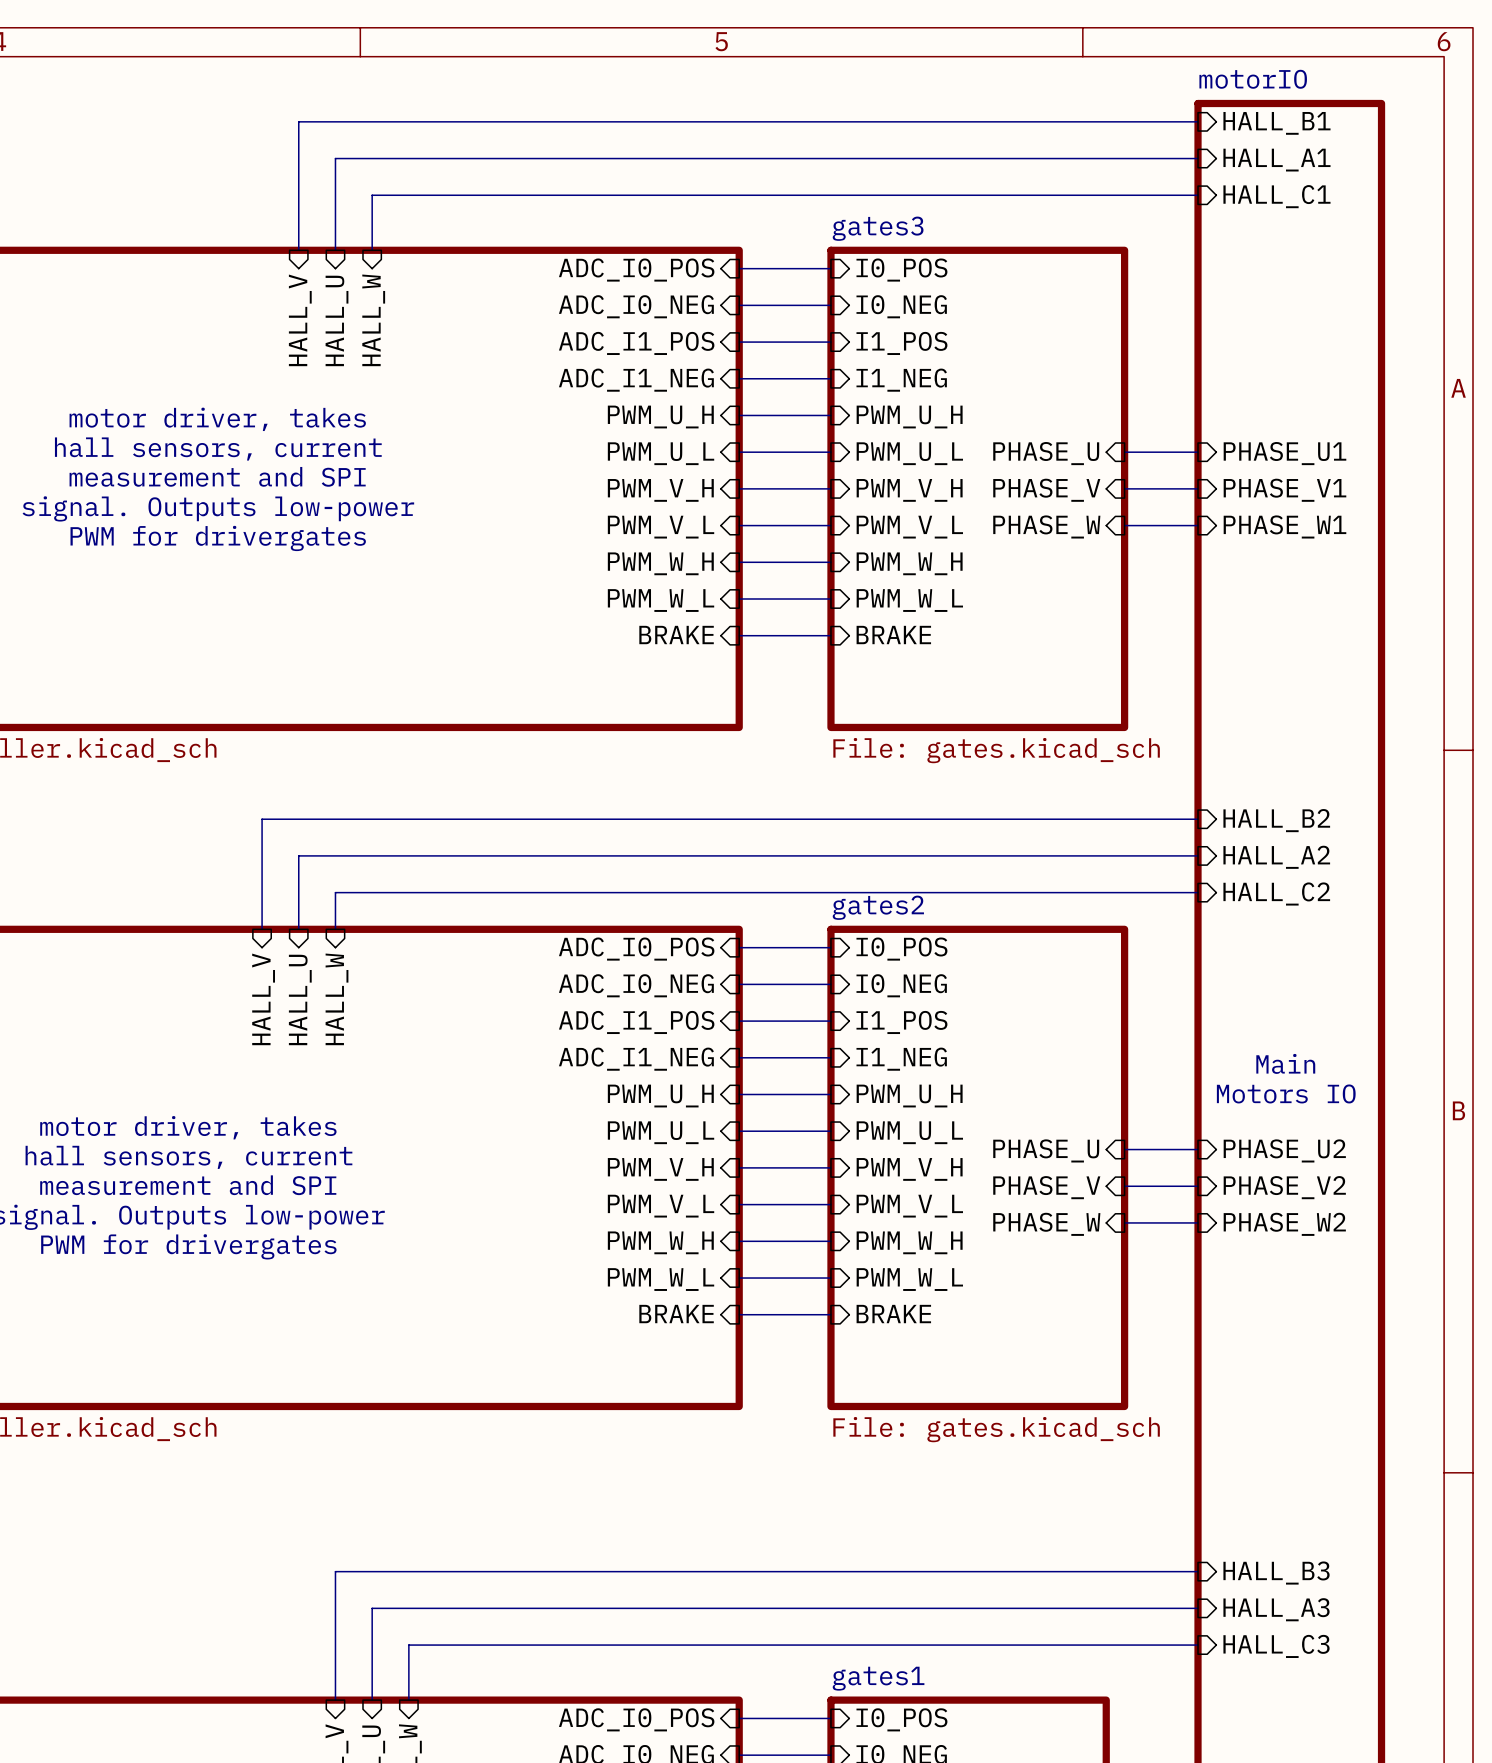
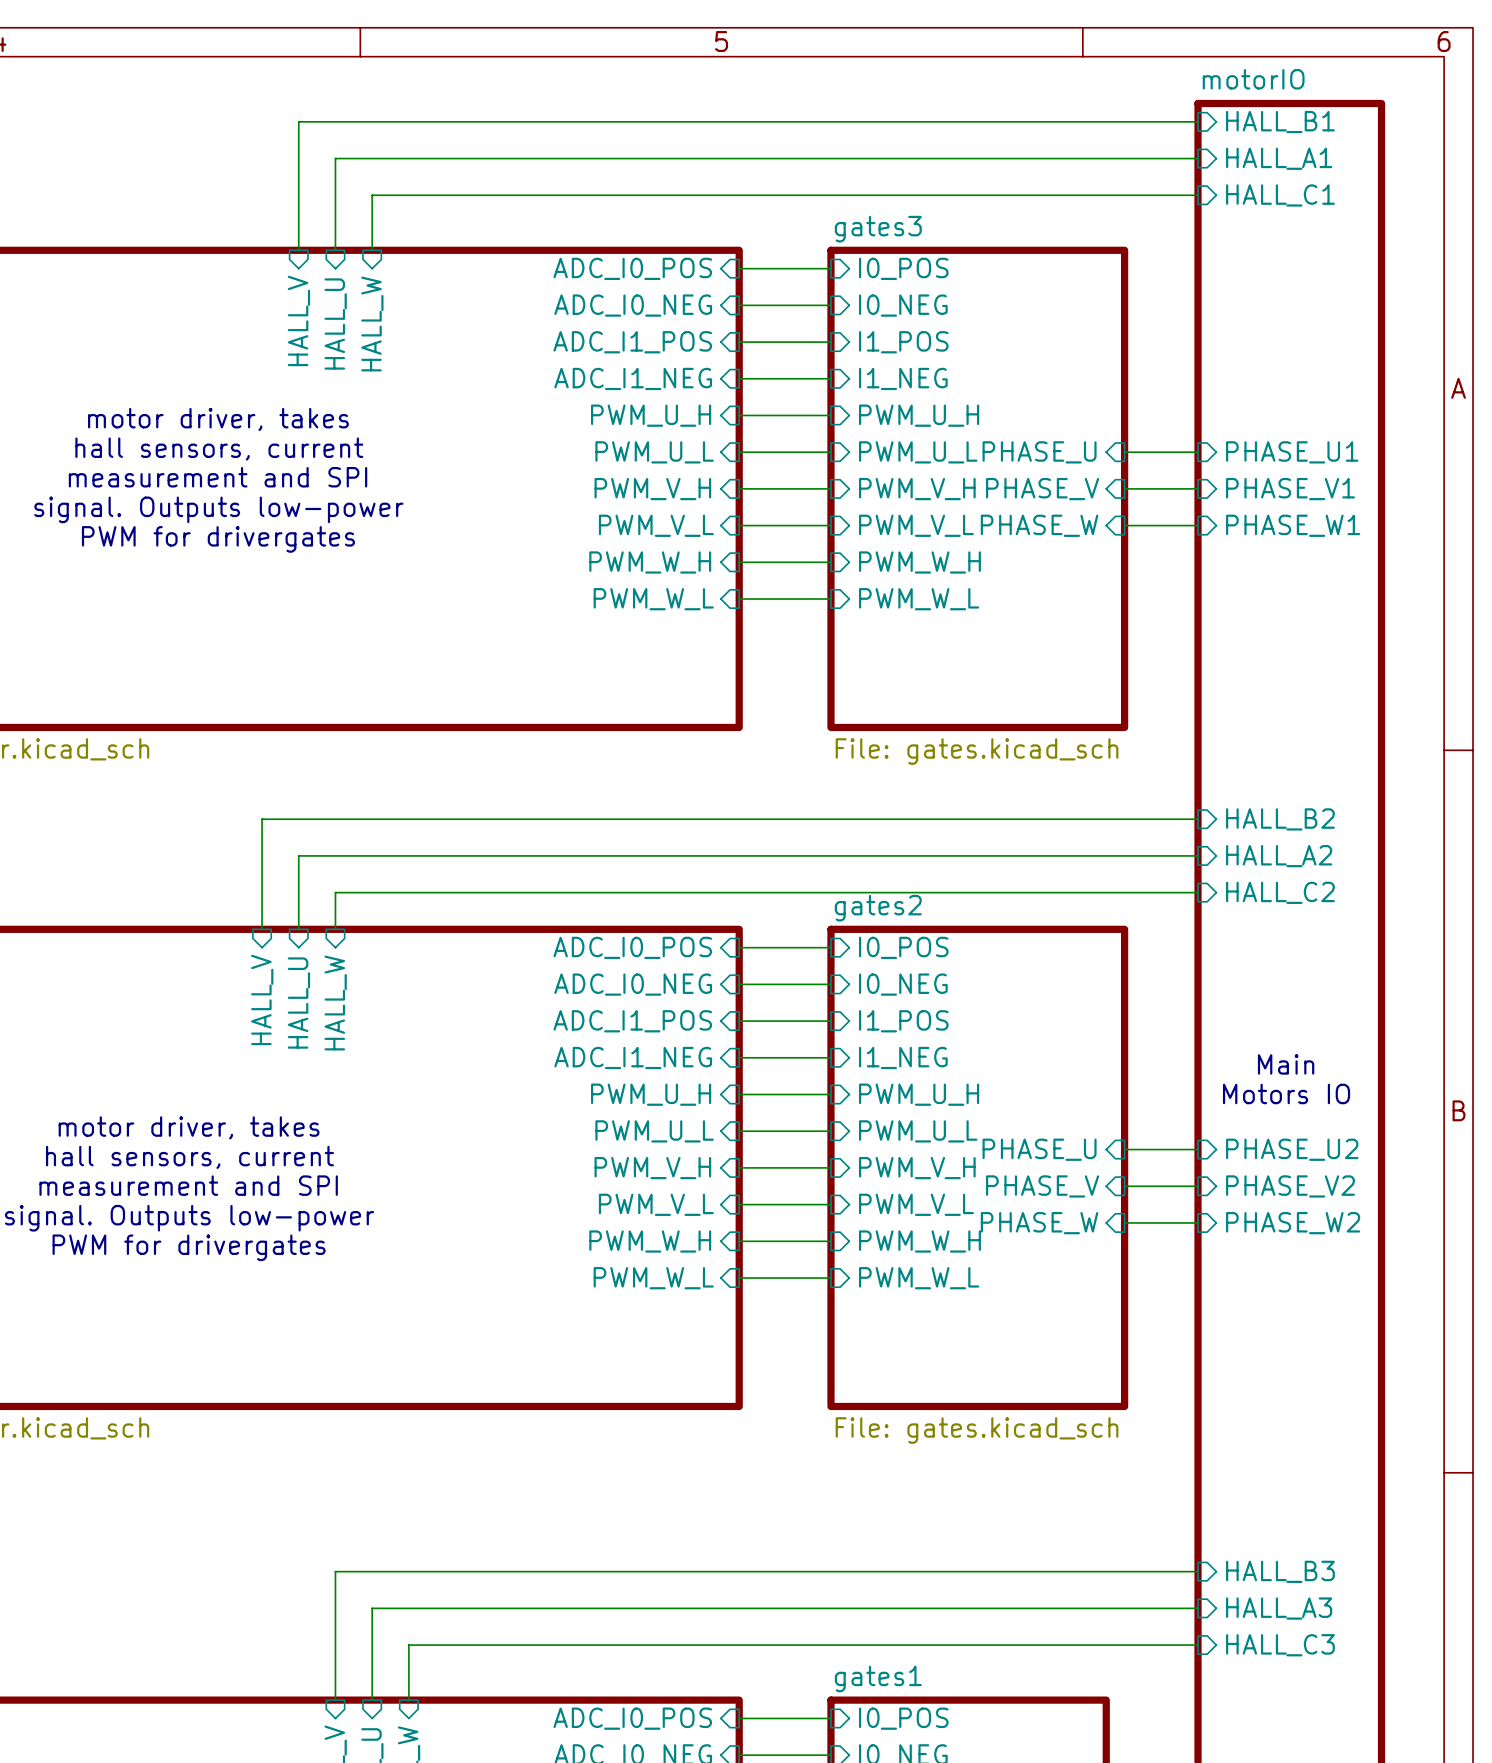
sheet pin: BRAKE (676, 635) -> none
wire: (739, 635) (830, 635) -> none
sheet pin: BRAKE (893, 635) -> none
sheet pin: BRAKE (676, 1314) -> none
wire: (739, 1314) (830, 1314) -> none
sheet pin: BRAKE (893, 1314) -> none

